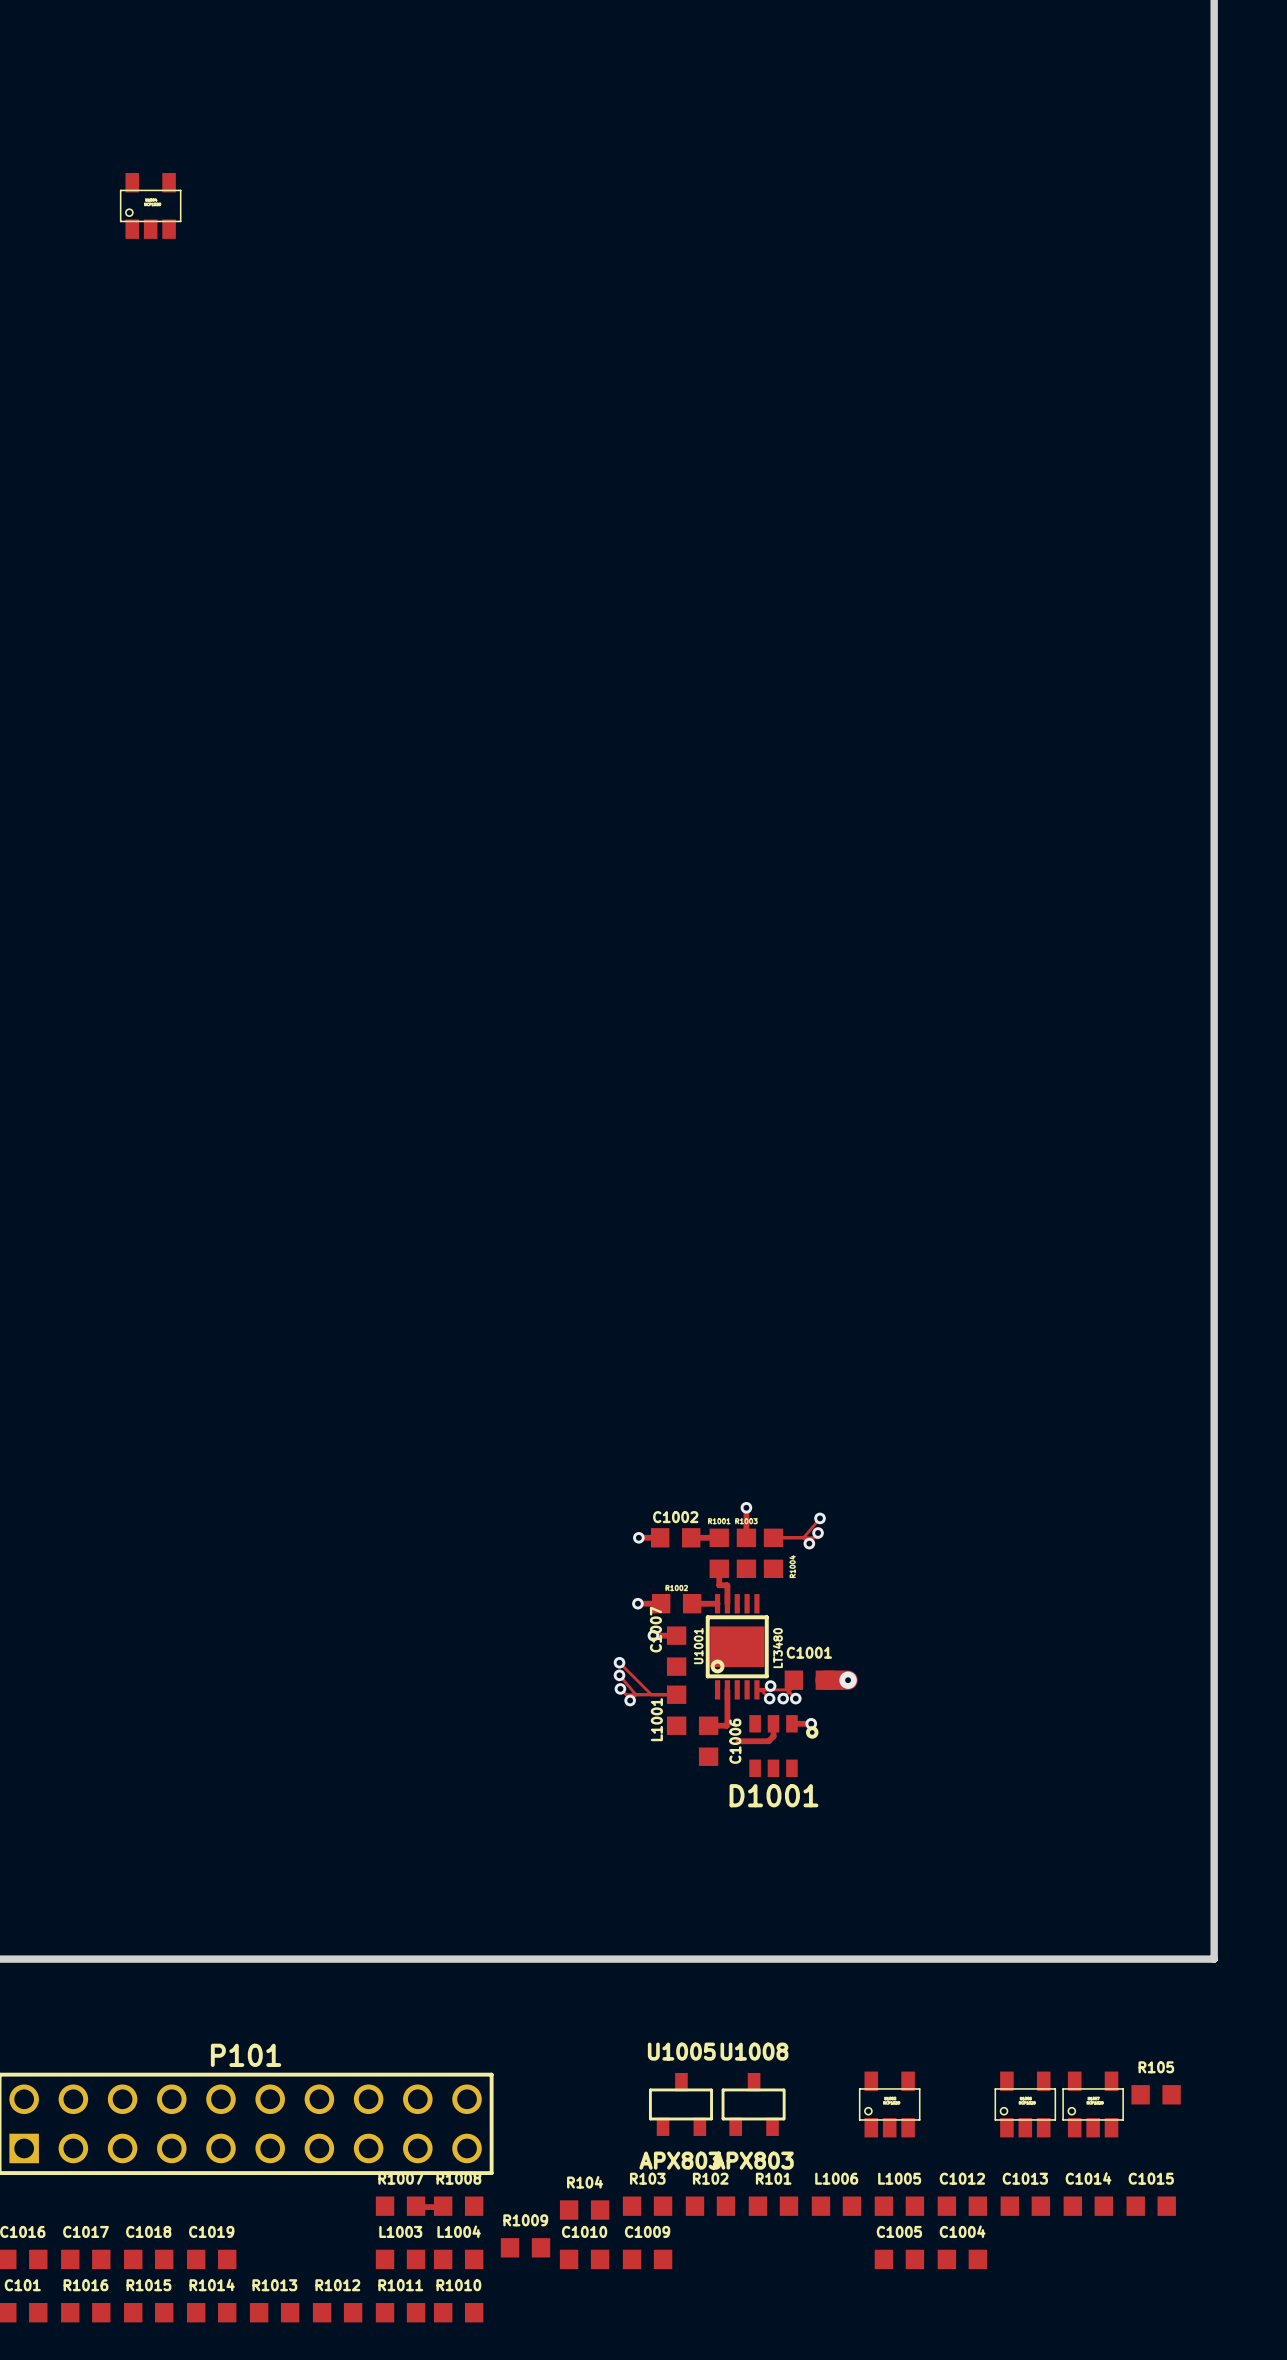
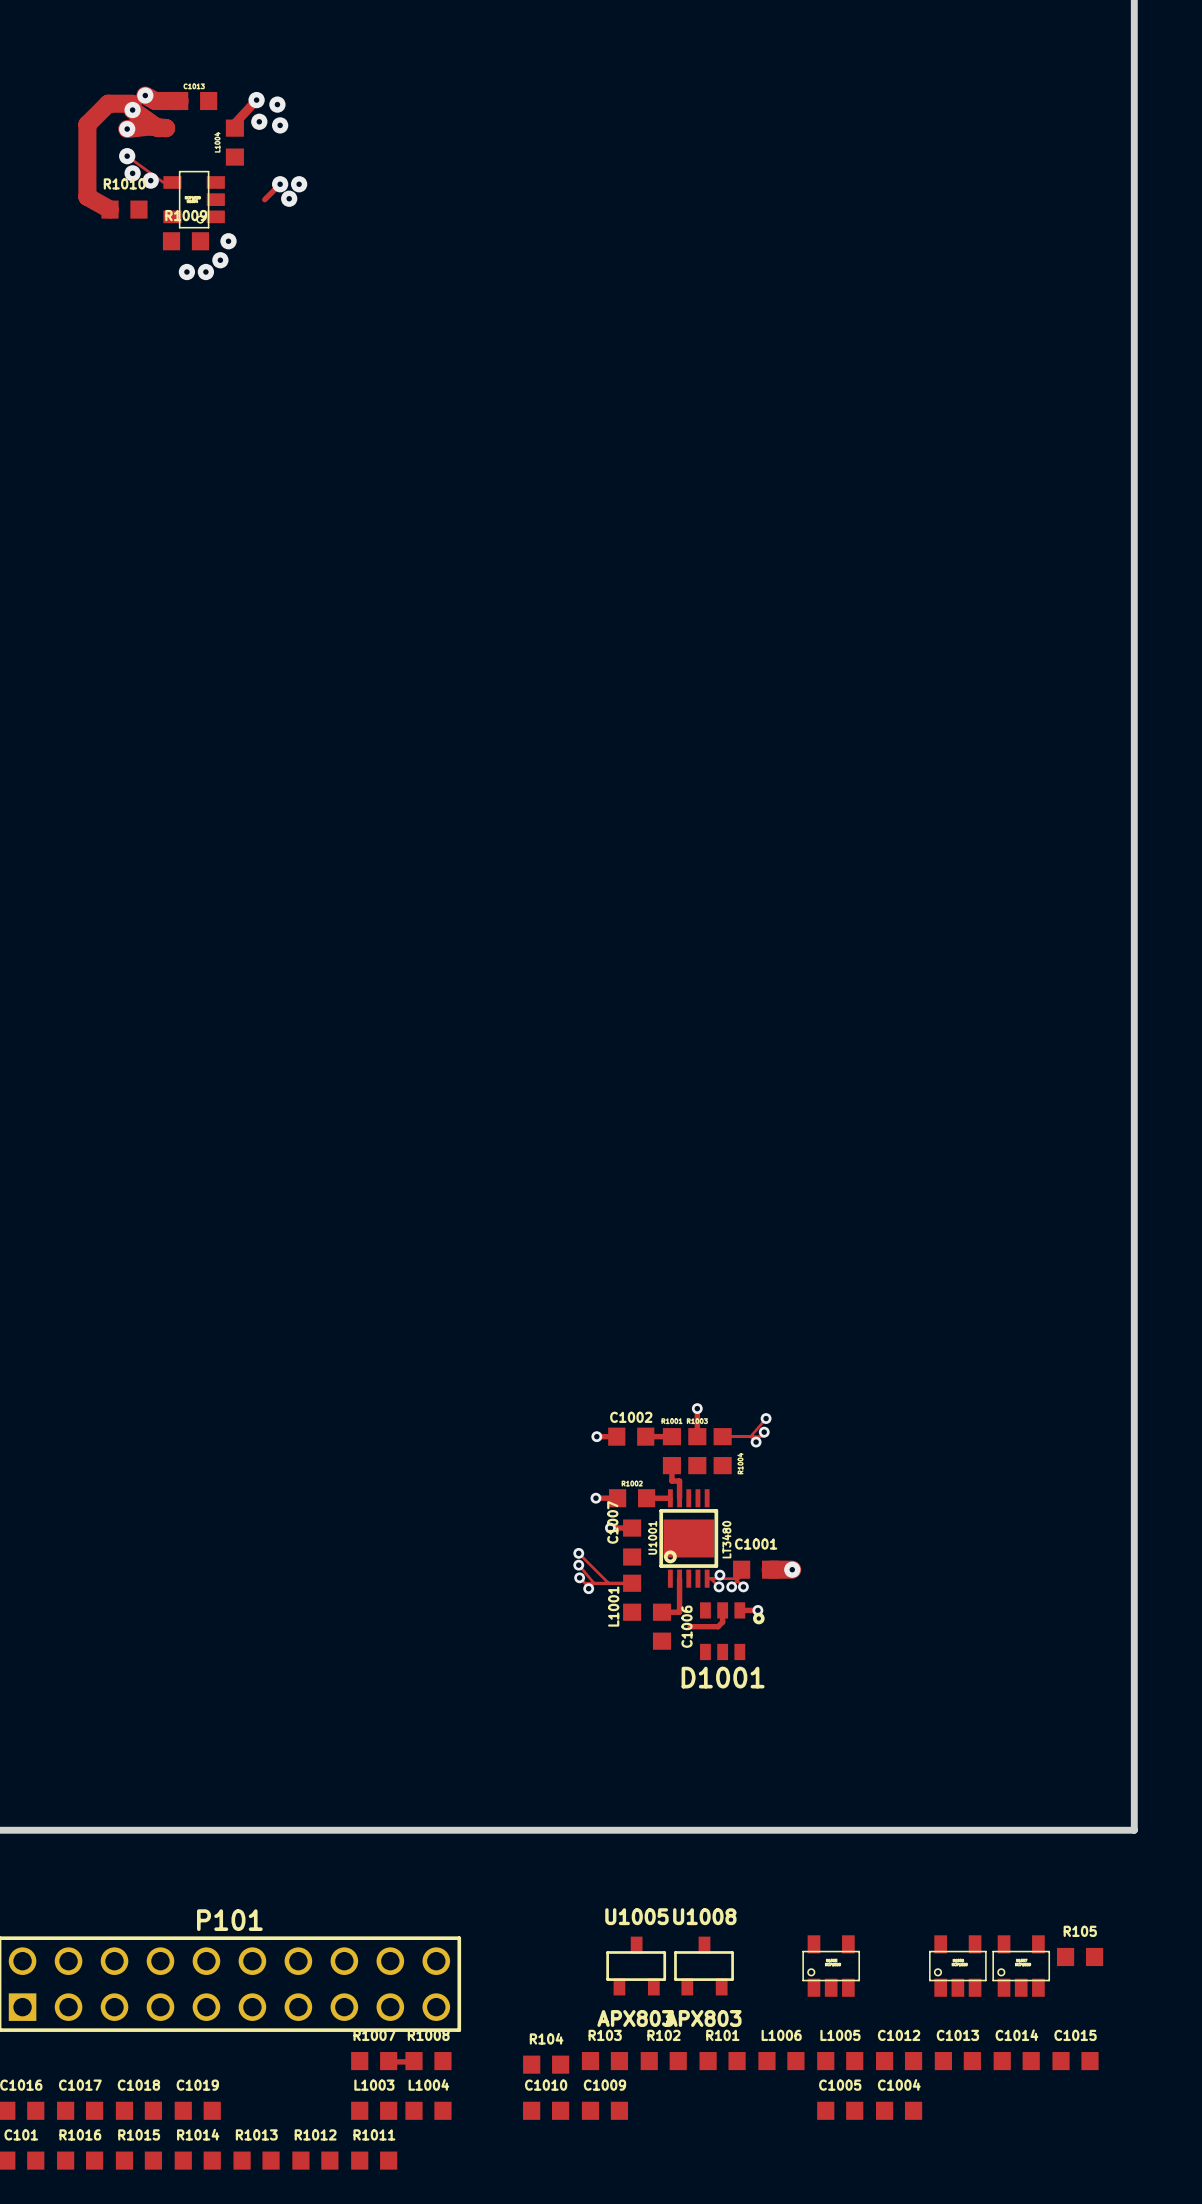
track: none -> (145, 95) (155, 101) (179, 101)
via: none -> (145, 95)
track: none -> (256, 100) (234, 123) (234, 128)
via: none -> (256, 100)
part: none -> (194, 101)
track: none -> (132, 103) (108, 103) (87, 124) (87, 196) (110, 209)
via: none -> (277, 104)
track: none -> (132, 110) (157, 128) (166, 128) (150, 126) (127, 129)
via: none -> (132, 110)
via: none -> (259, 121)
via: none -> (280, 125)
via: none -> (127, 129)
part: none -> (234, 142)
track: none -> (127, 156) (163, 182)
via: none -> (127, 156)
via: none -> (132, 173)
via: none -> (150, 180)
track: none -> (280, 184) (264, 199)
via: none -> (280, 184)
via: none -> (299, 184)
part rotation: 0° (150, 205) -> 90° counterclockwise (194, 199)
part position: (150, 205) -> (194, 199)
via: none -> (289, 198)
via: none -> (228, 241)
via: none -> (220, 260)
via: none -> (186, 272)
via: none -> (205, 272)
R1009 position: (525, 2247) -> (185, 241)
R1010 position: (458, 2312) -> (124, 209)

